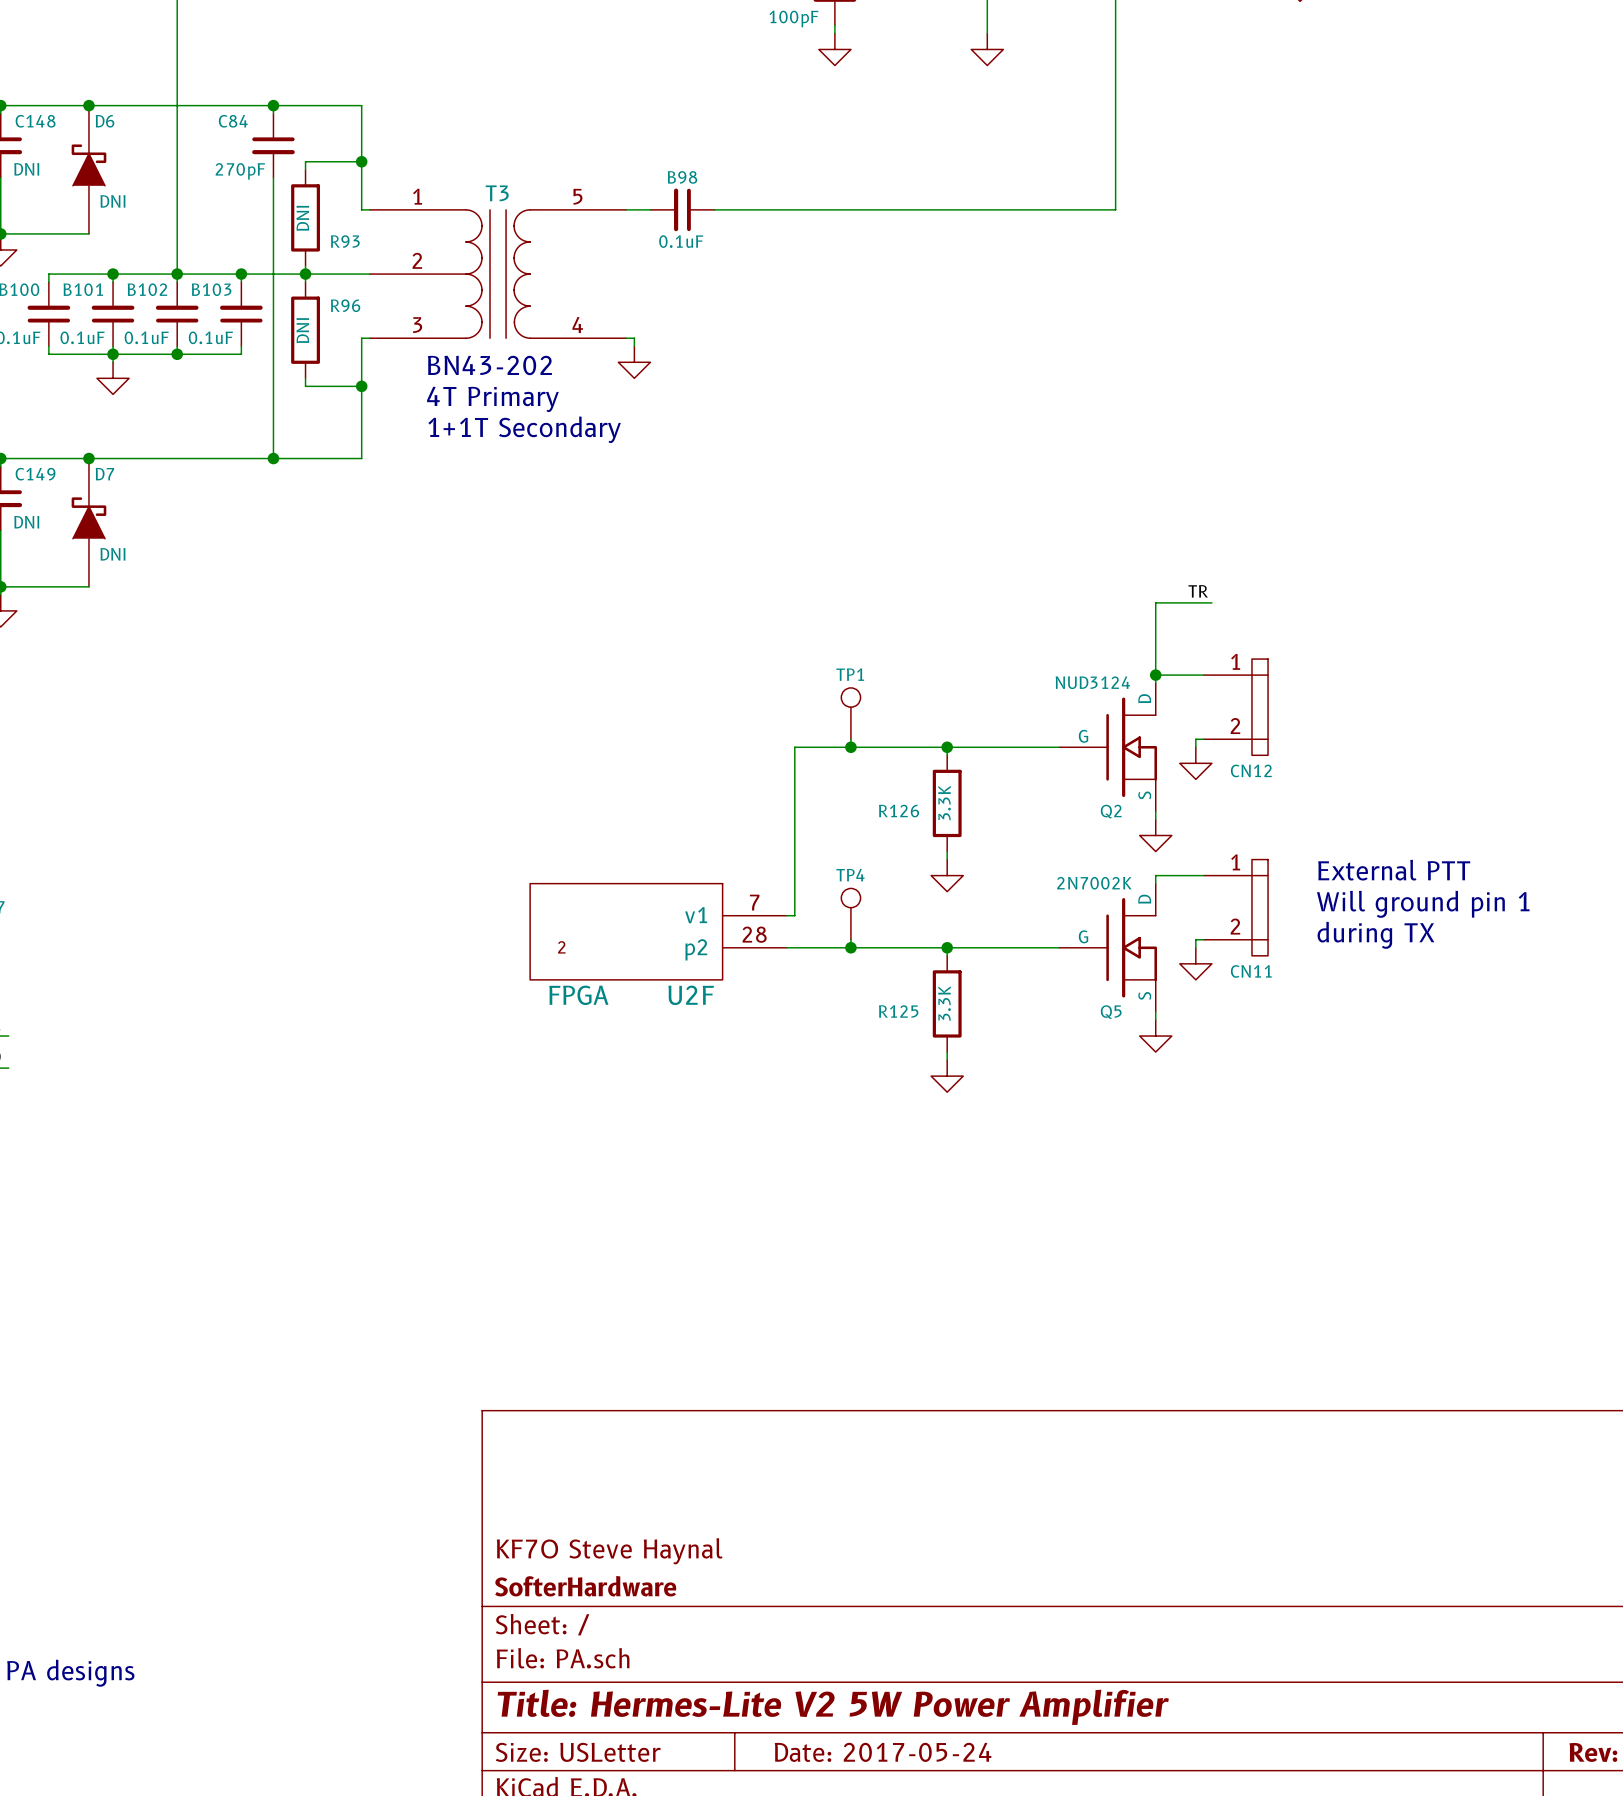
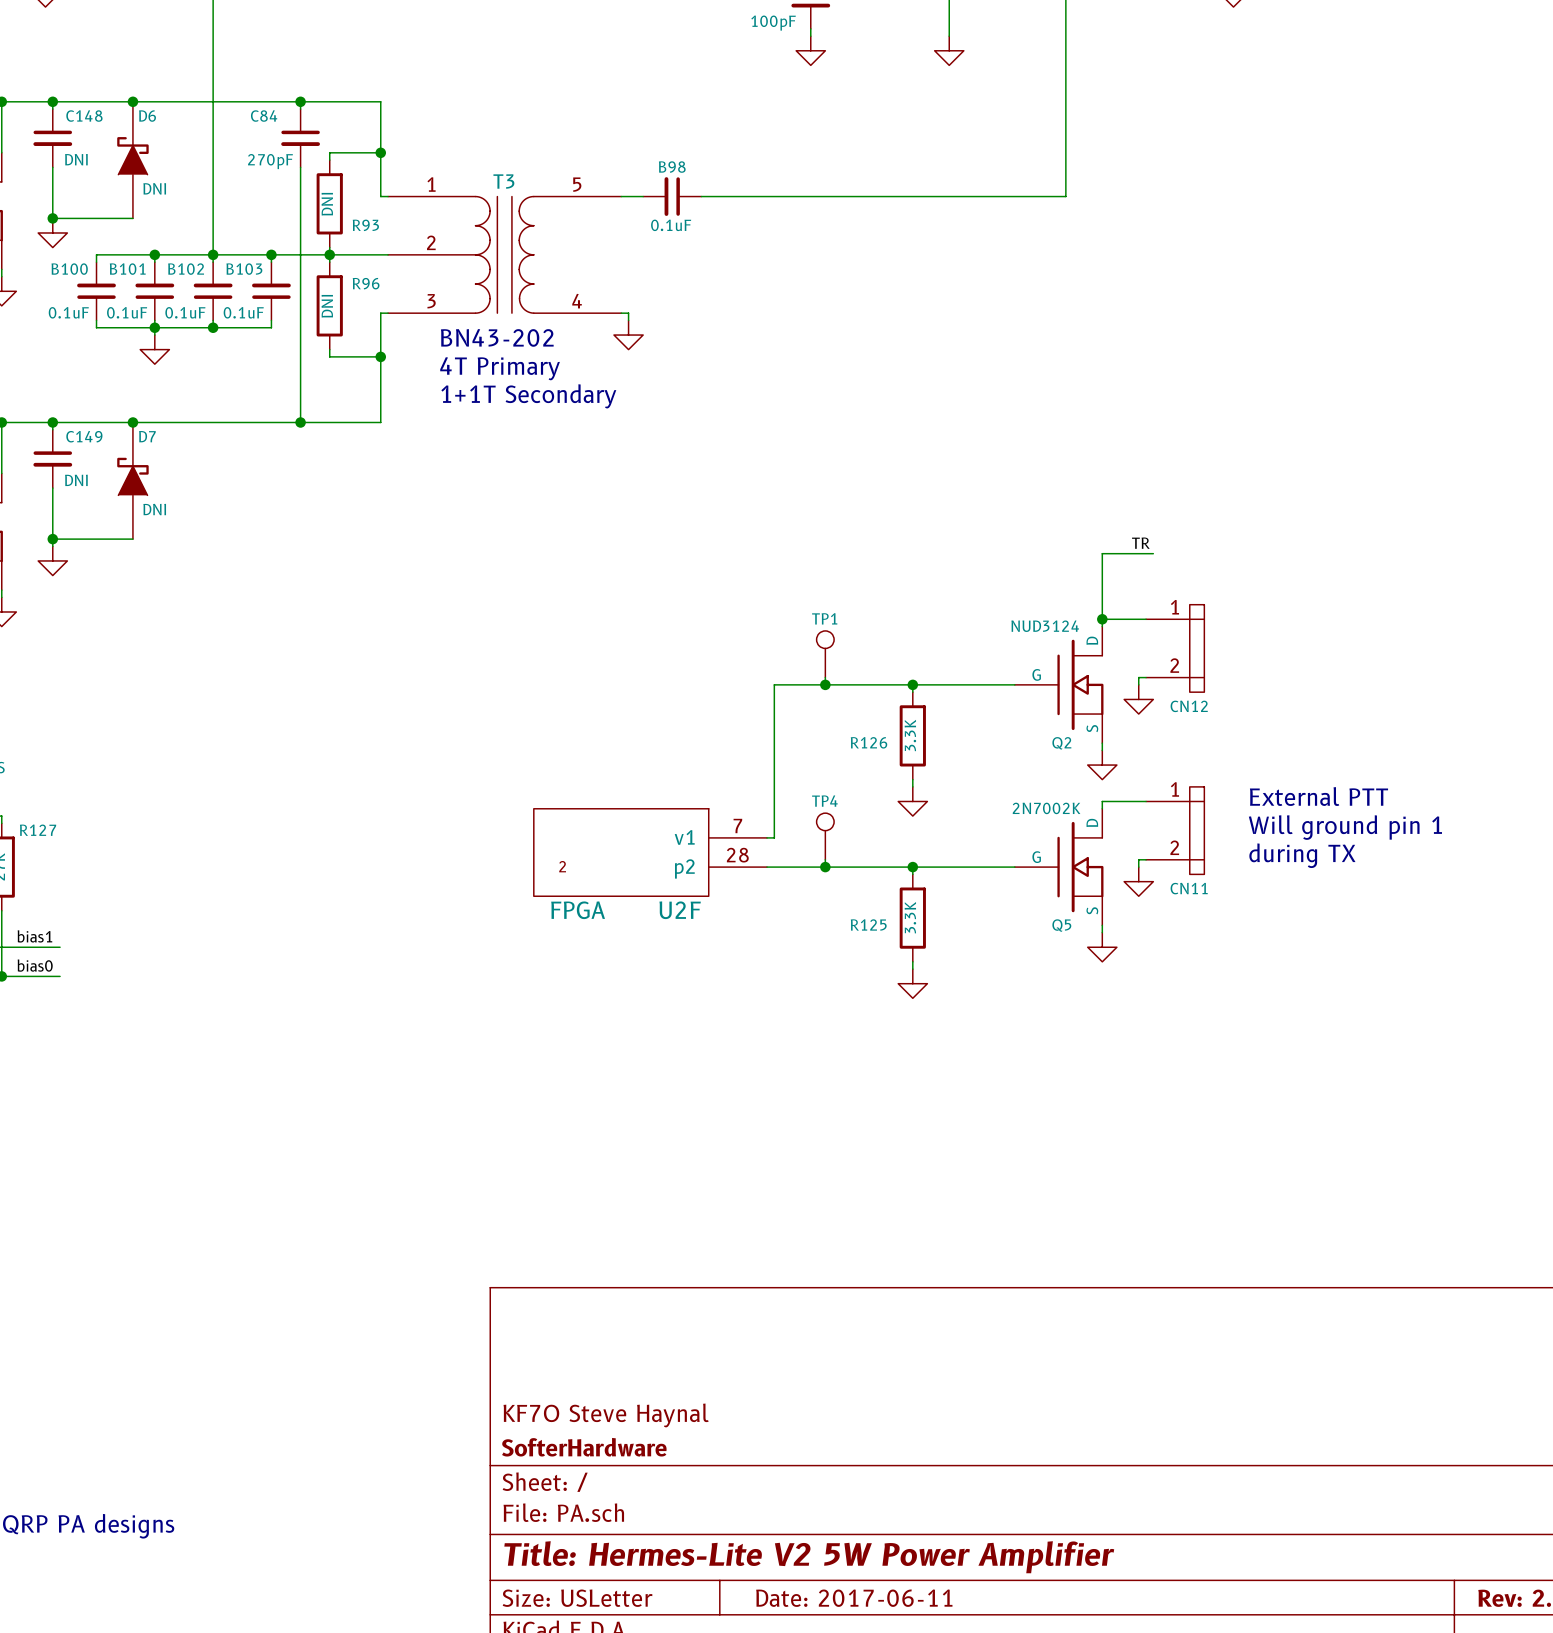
title block: Date: 2017-05-24 (883, 1752) -> Date: 2017-06-11 (854, 1598)

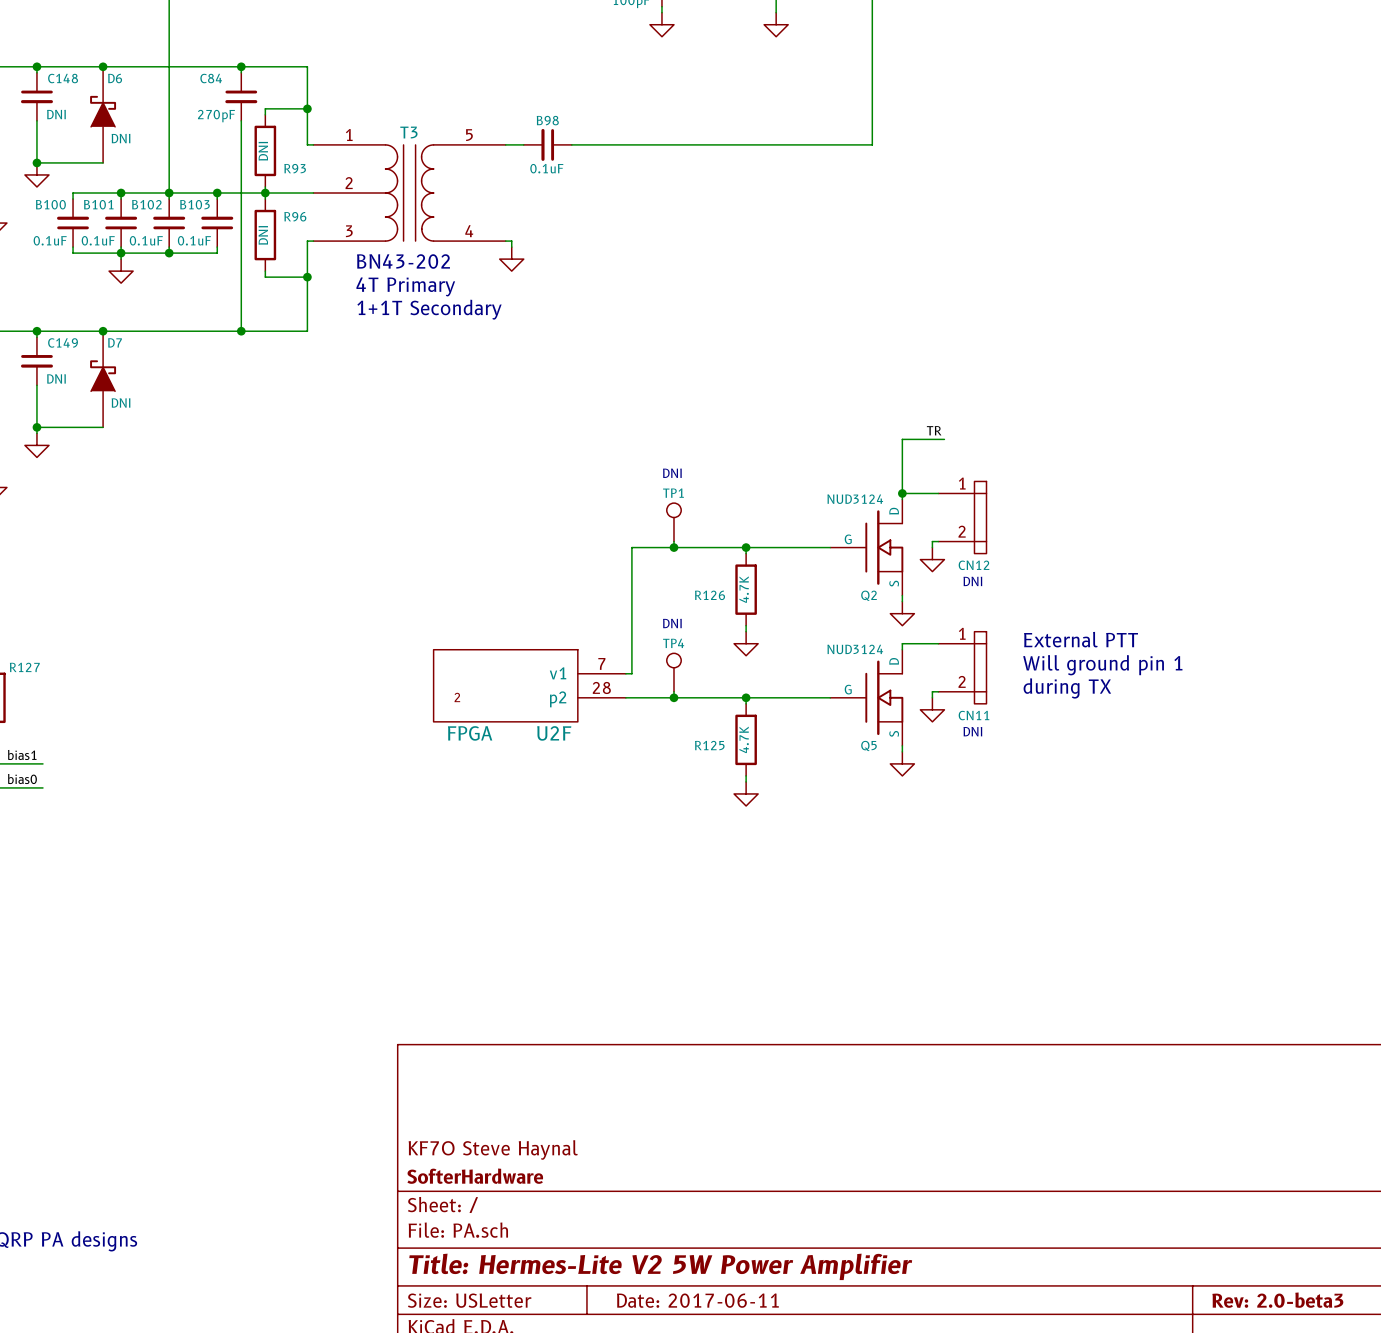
text: none -> DNI (672, 473)
text: none -> DNI (972, 581)
R126 value: 3.3K (910, 735) -> 4.7K (744, 589)
text: none -> DNI (672, 623)
Q5 value: 2N7002K (1046, 808) -> NUD3124 (855, 649)
text: none -> DNI (972, 731)
R125 value: 3.3K (910, 917) -> 4.7K (744, 739)

